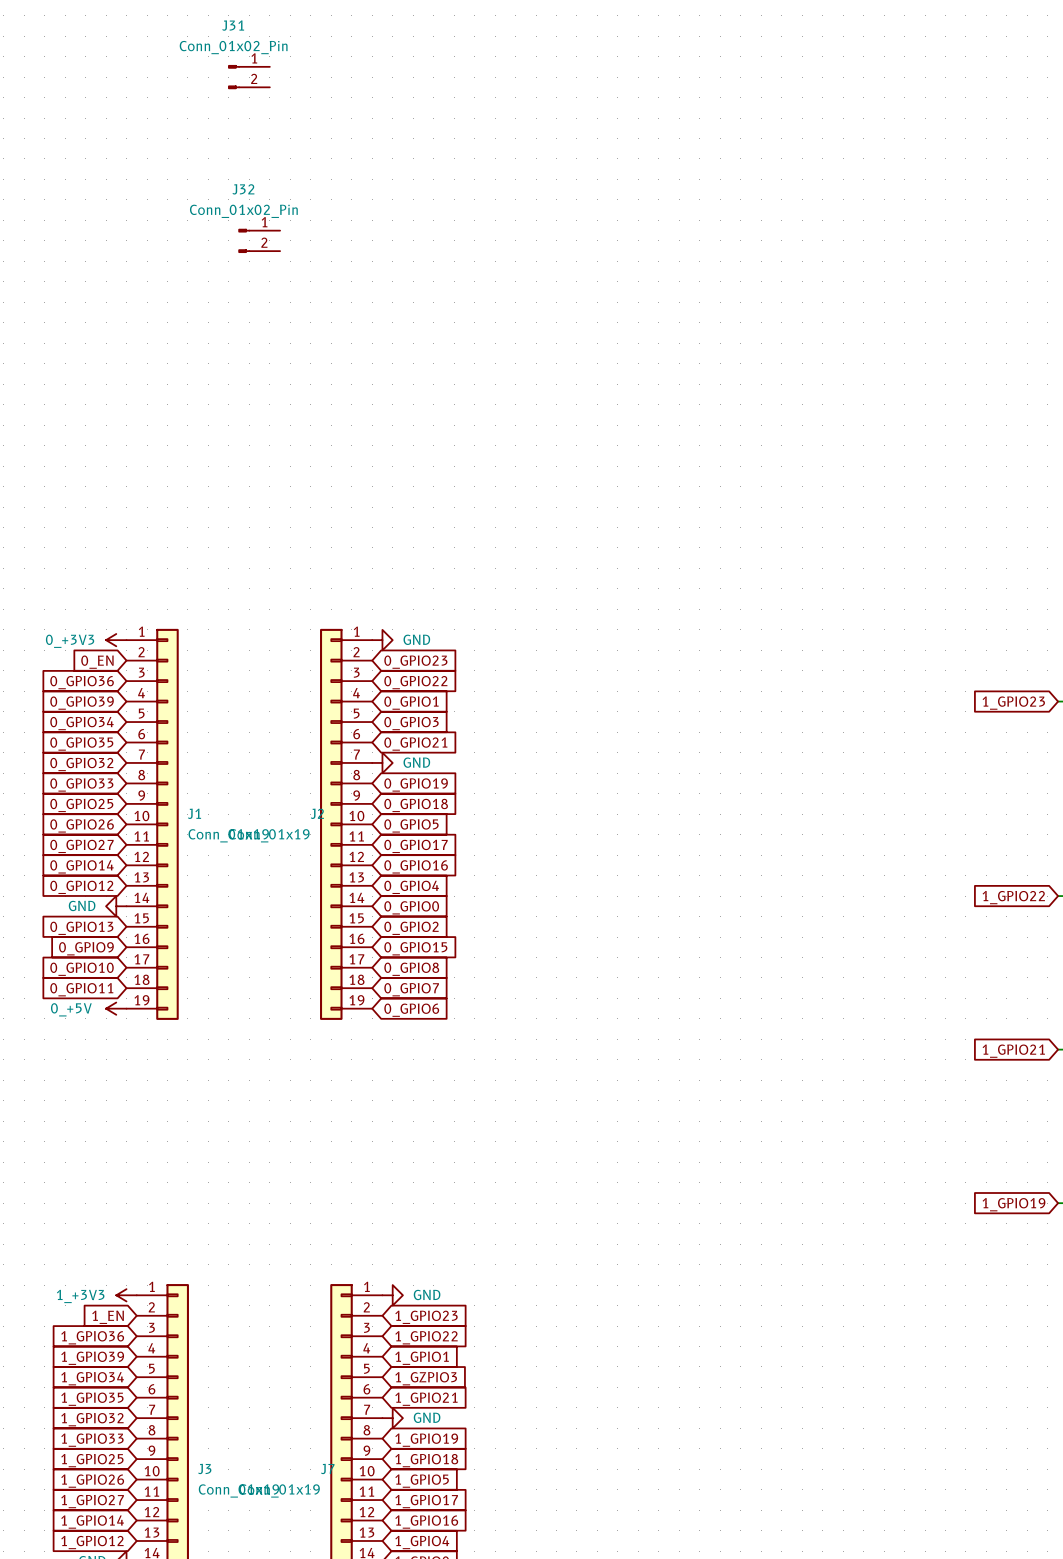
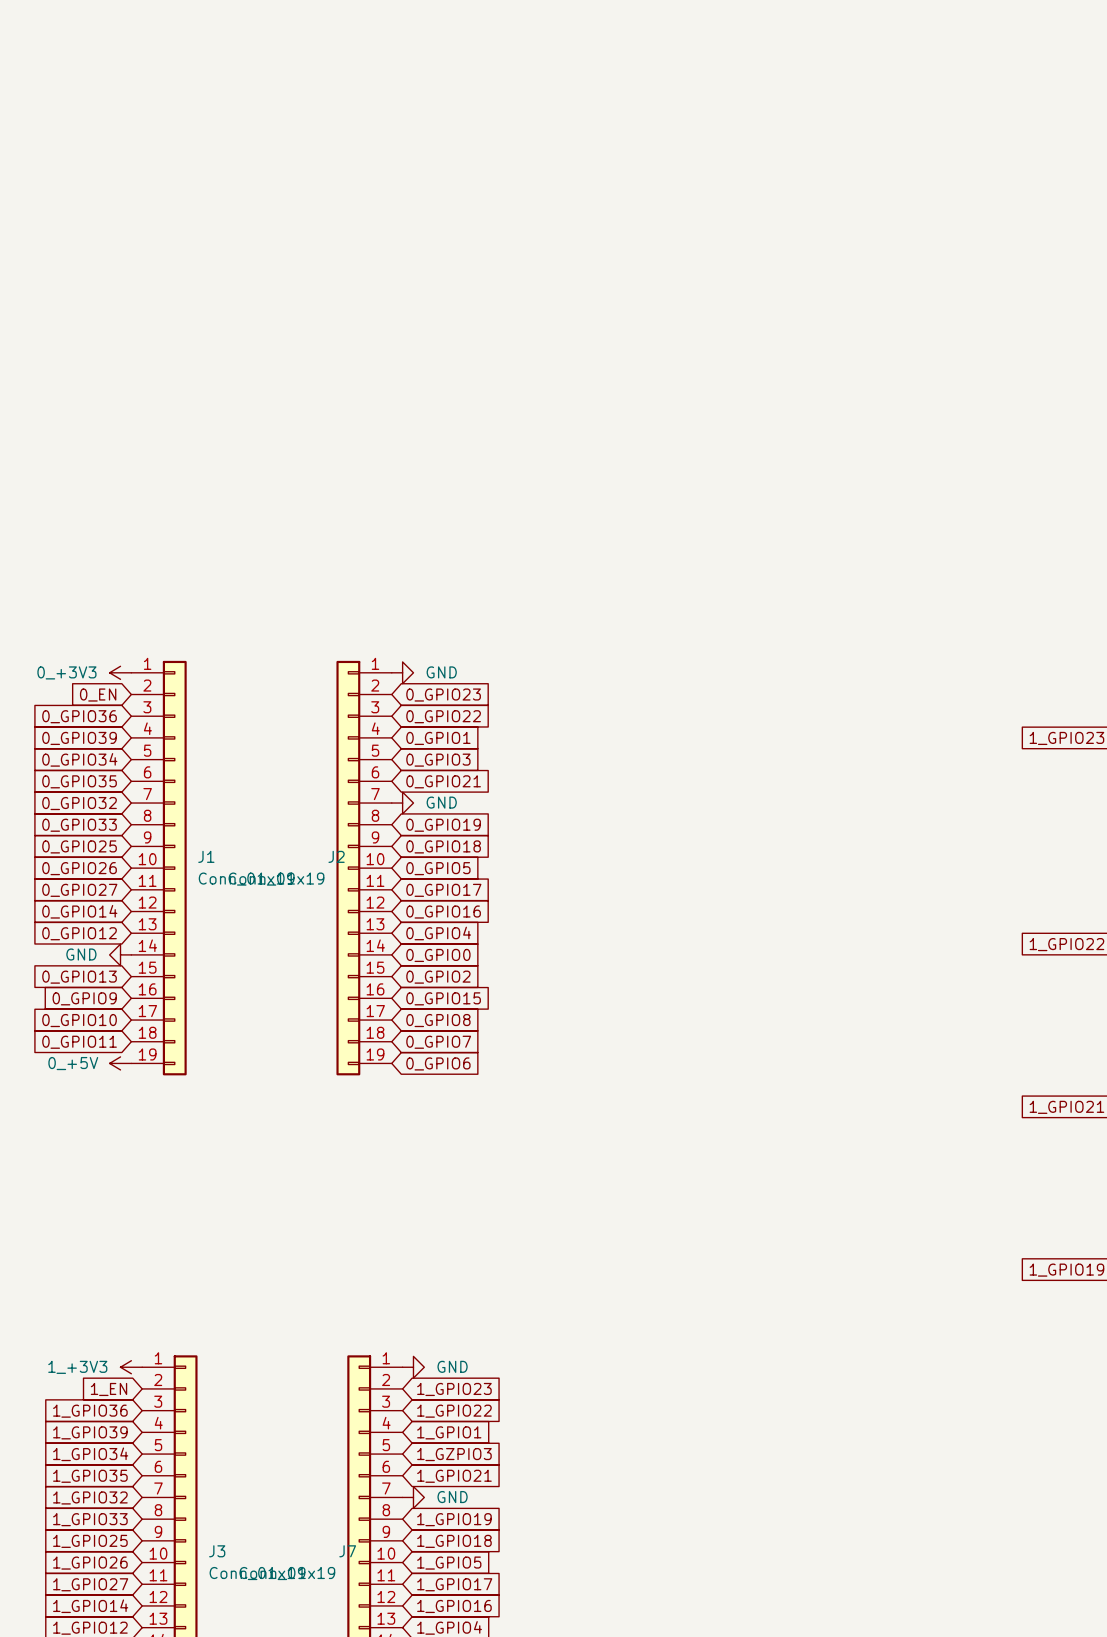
J31: Conn_01x02_Pin (249, 77) -> none
J32: Conn_01x02_Pin (259, 240) -> none

